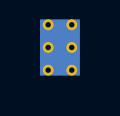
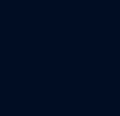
part: (59, 47) -> none

